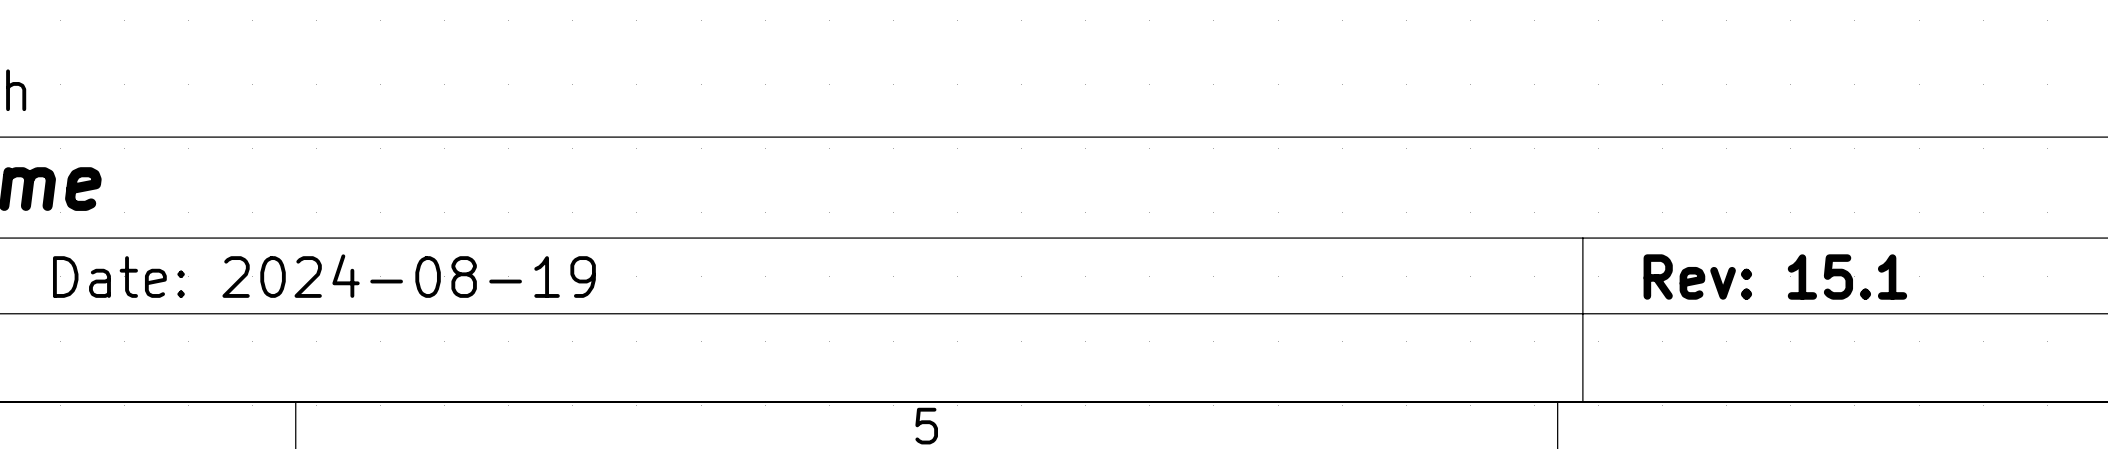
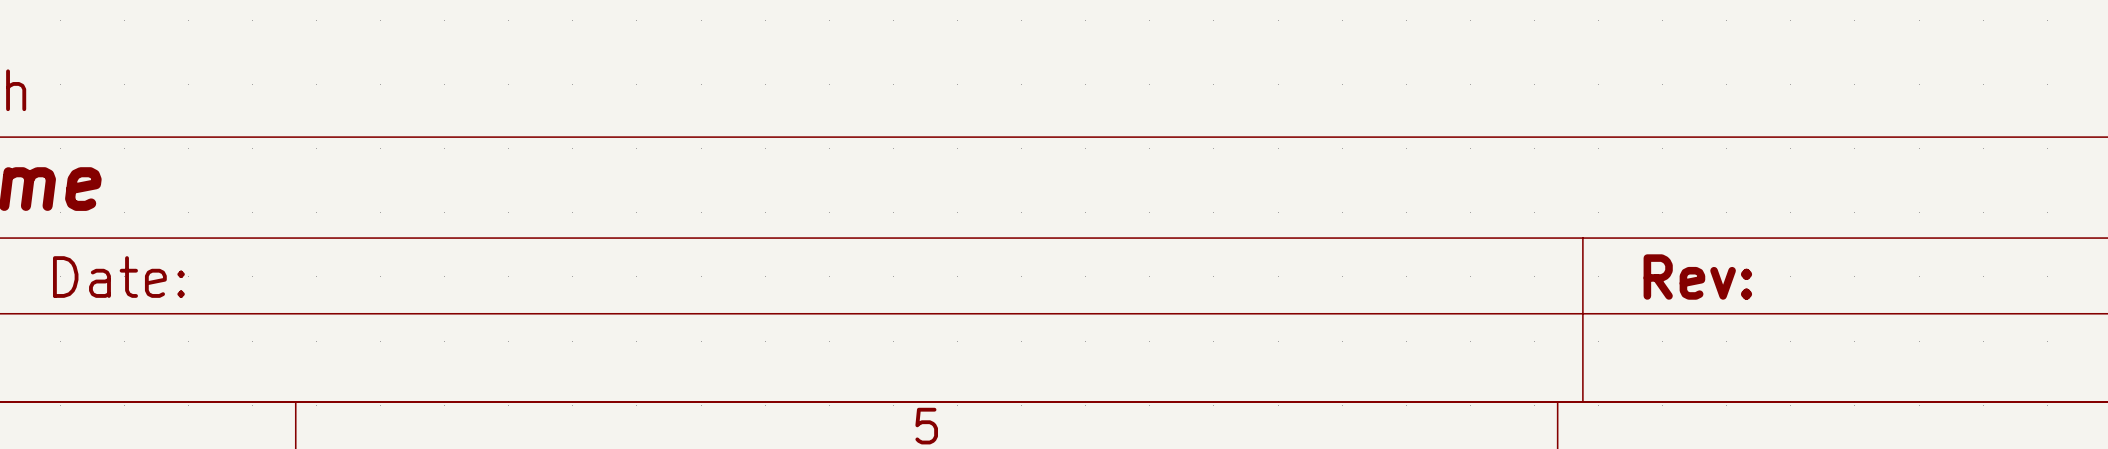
title block: Date: 2024-08-19 (324, 276) -> Date: (118, 277)
title block: Rev: 15.1 (1775, 277) -> Rev: (1697, 277)

